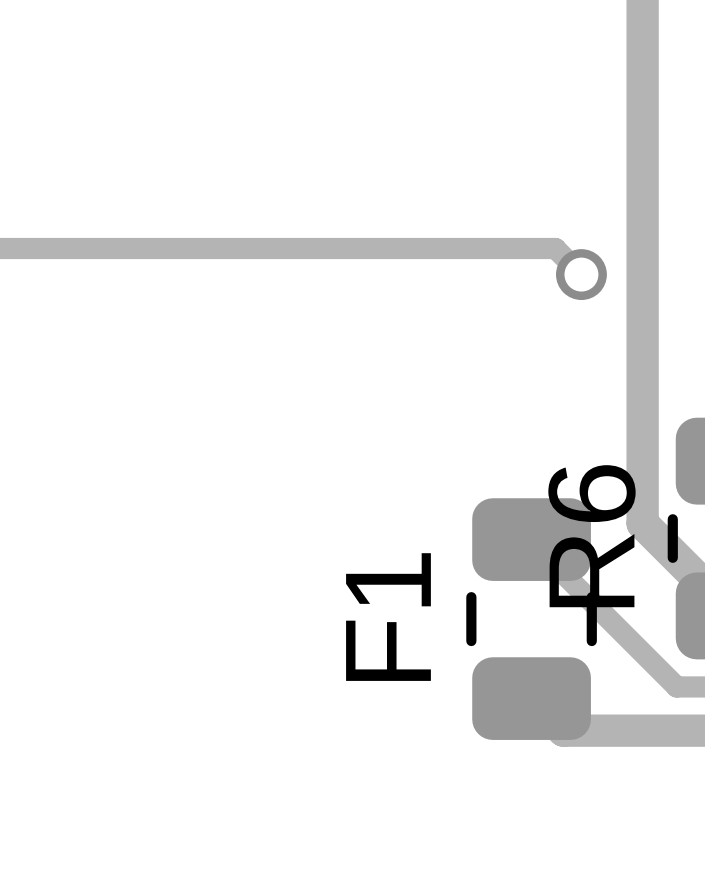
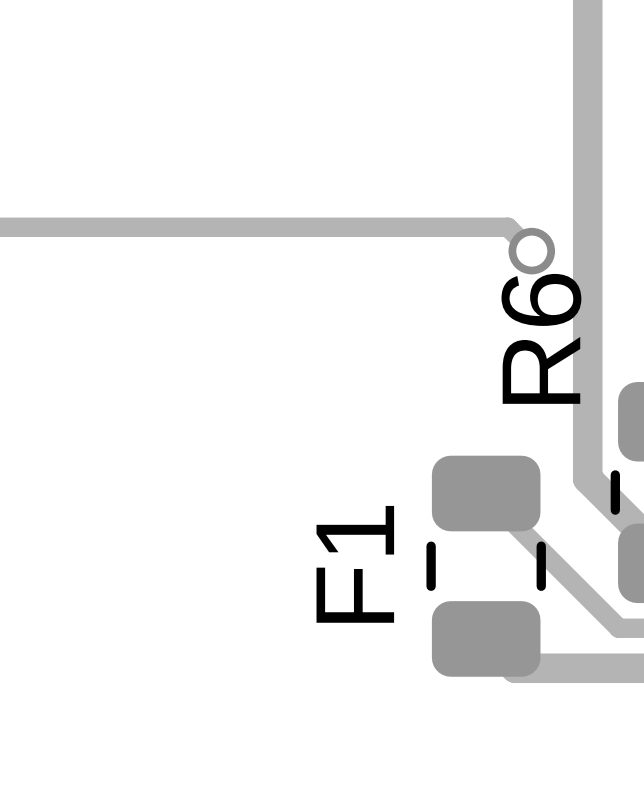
R6 name position: R6 (591, 536) -> R6 (541, 338)

